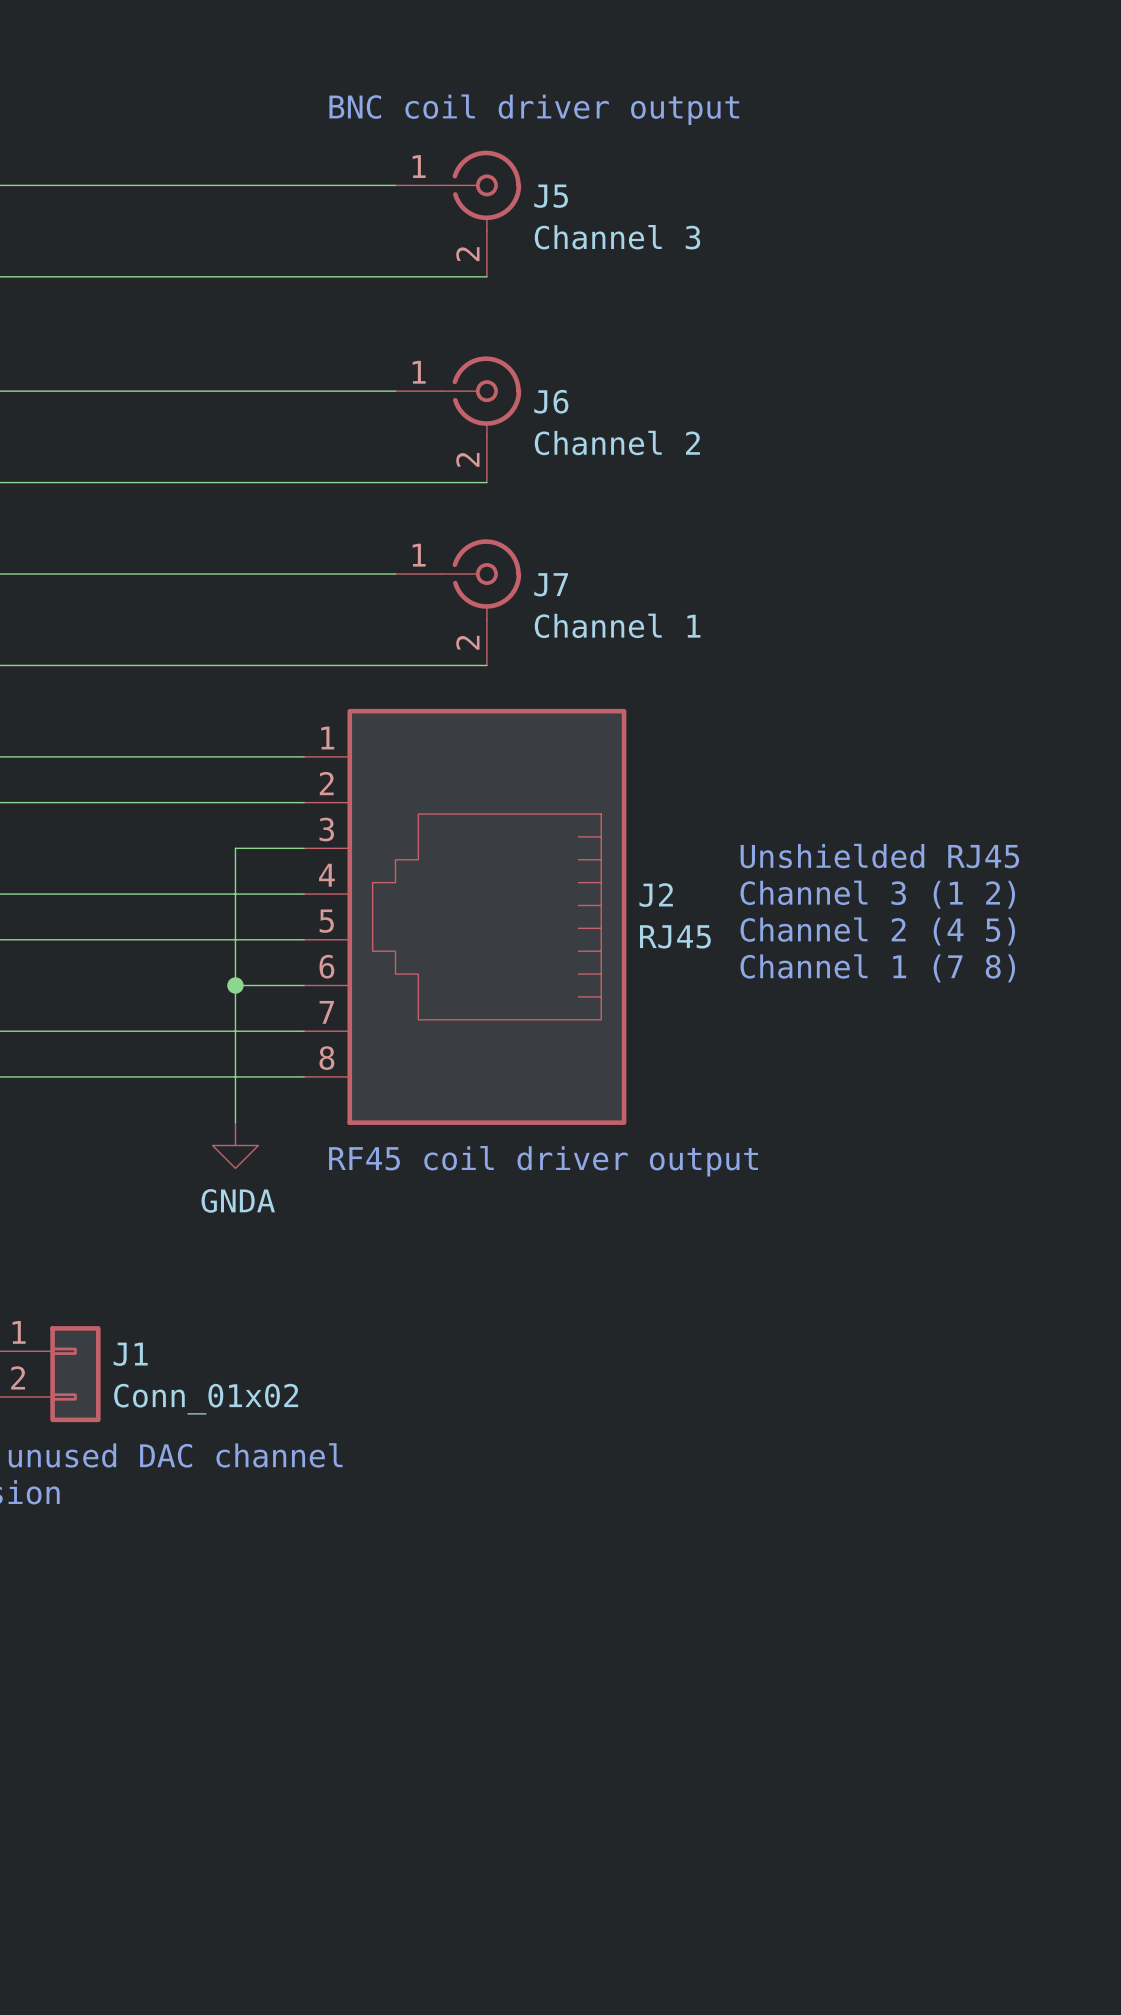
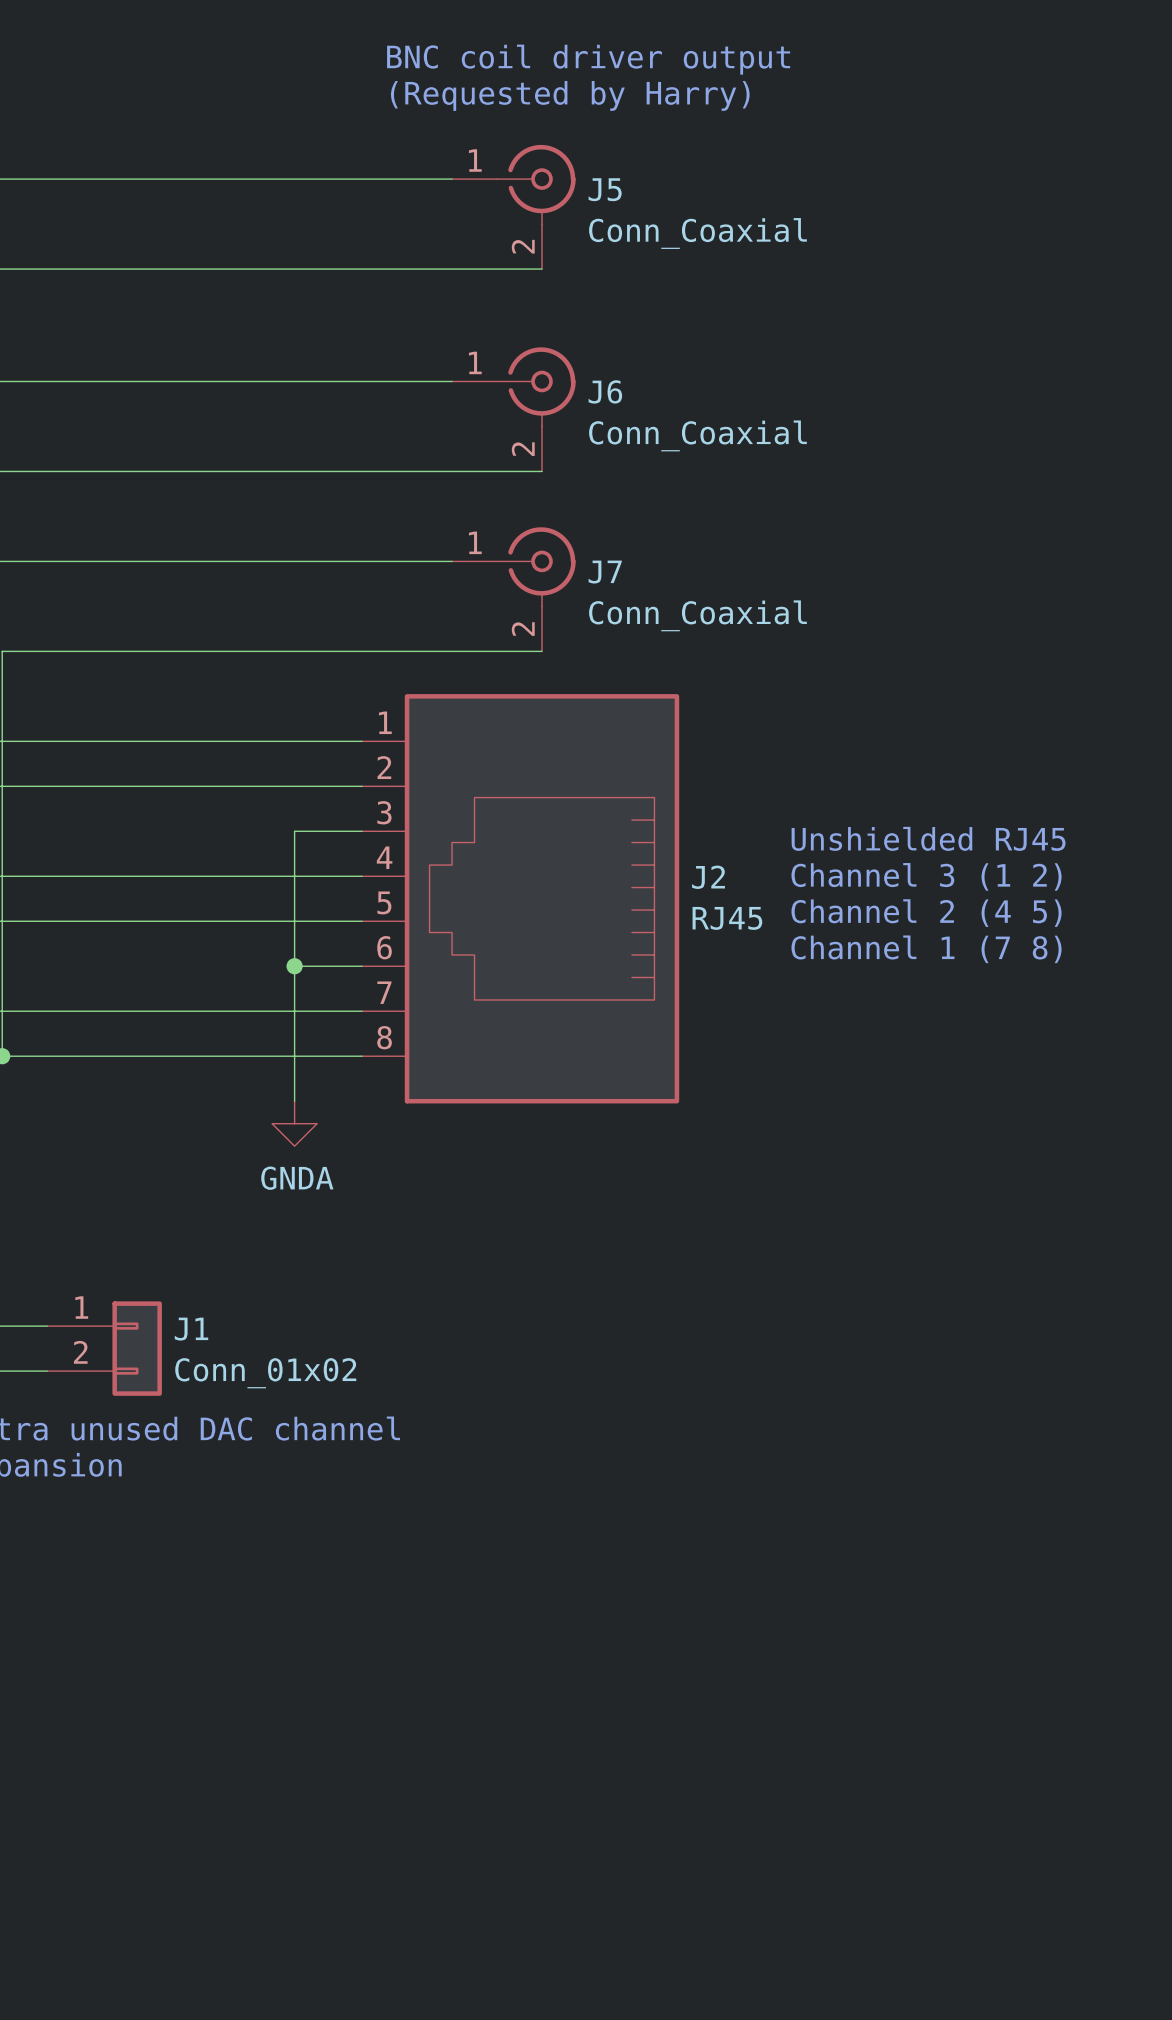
text: none -> (Requested by Harry) (570, 95)
text position: BNC coil driver output (534, 109) -> BNC coil driver output (588, 59)
J5 value: Channel 3 (617, 237) -> Conn_Coaxial (697, 233)
J6 value: Channel 2 (617, 442) -> Conn_Coaxial (697, 435)
J7 value: Channel 1 (617, 625) -> Conn_Coaxial (697, 615)
text: RF45 coil driver output (543, 1161) -> none

